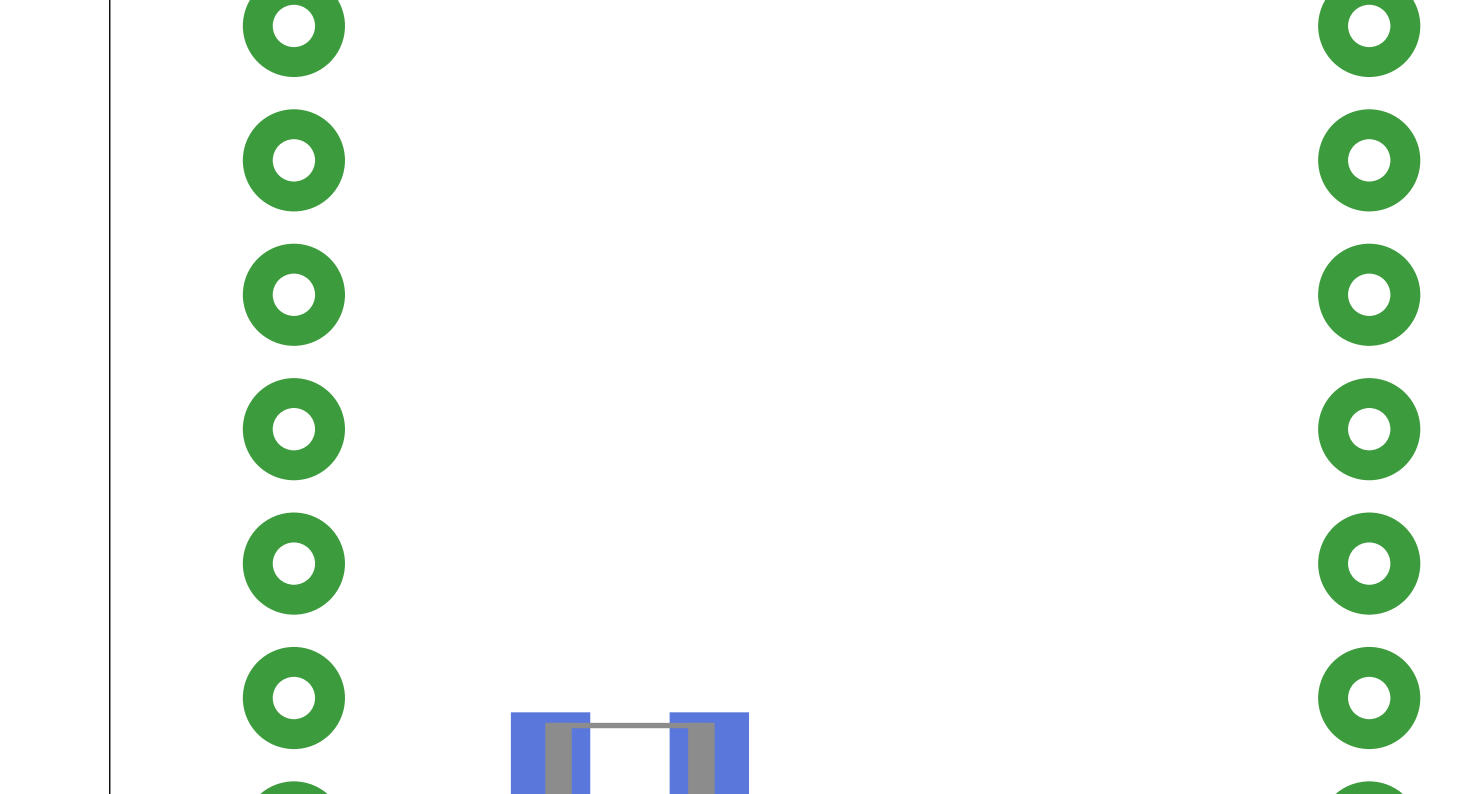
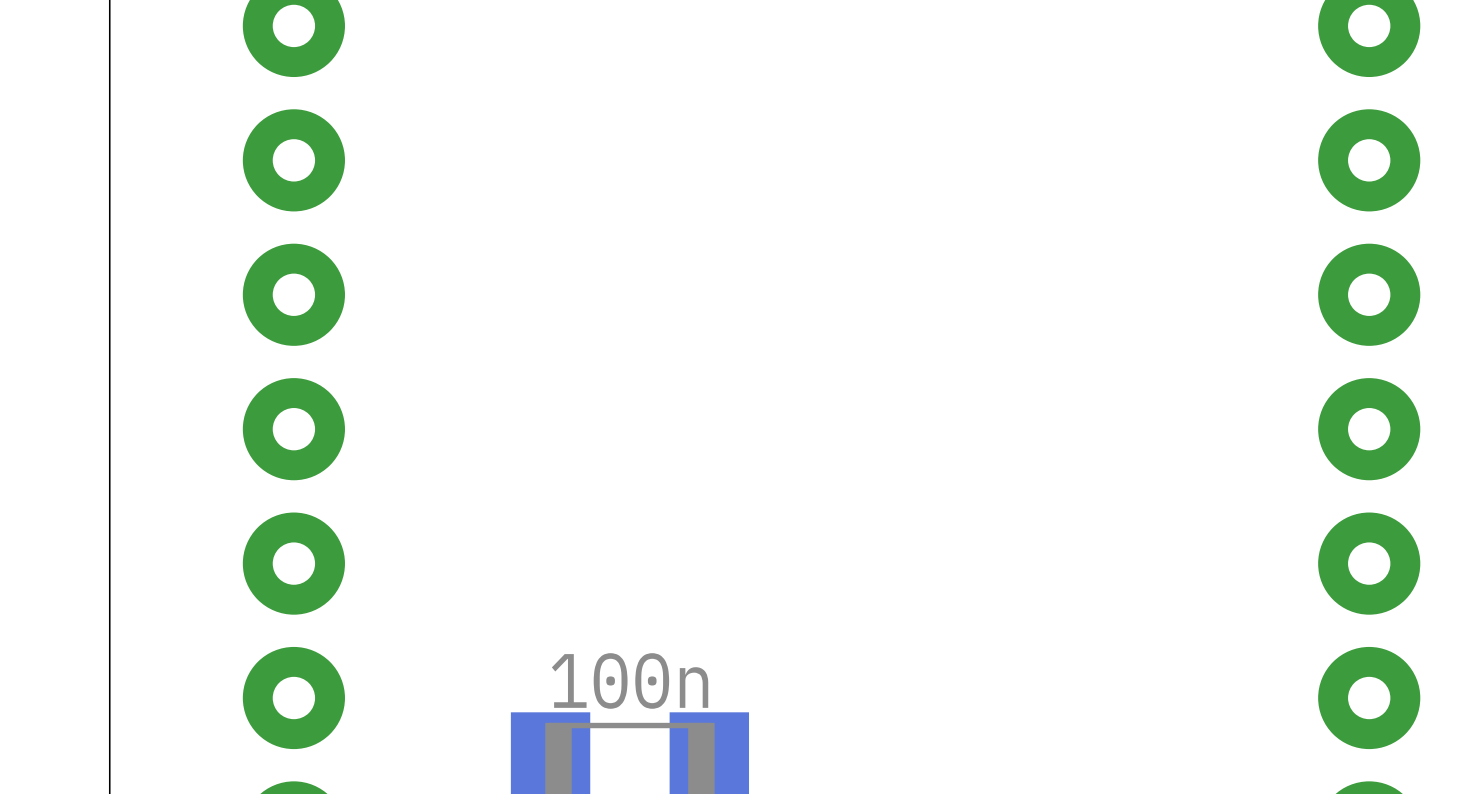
part value: none -> 100n (630, 680)

